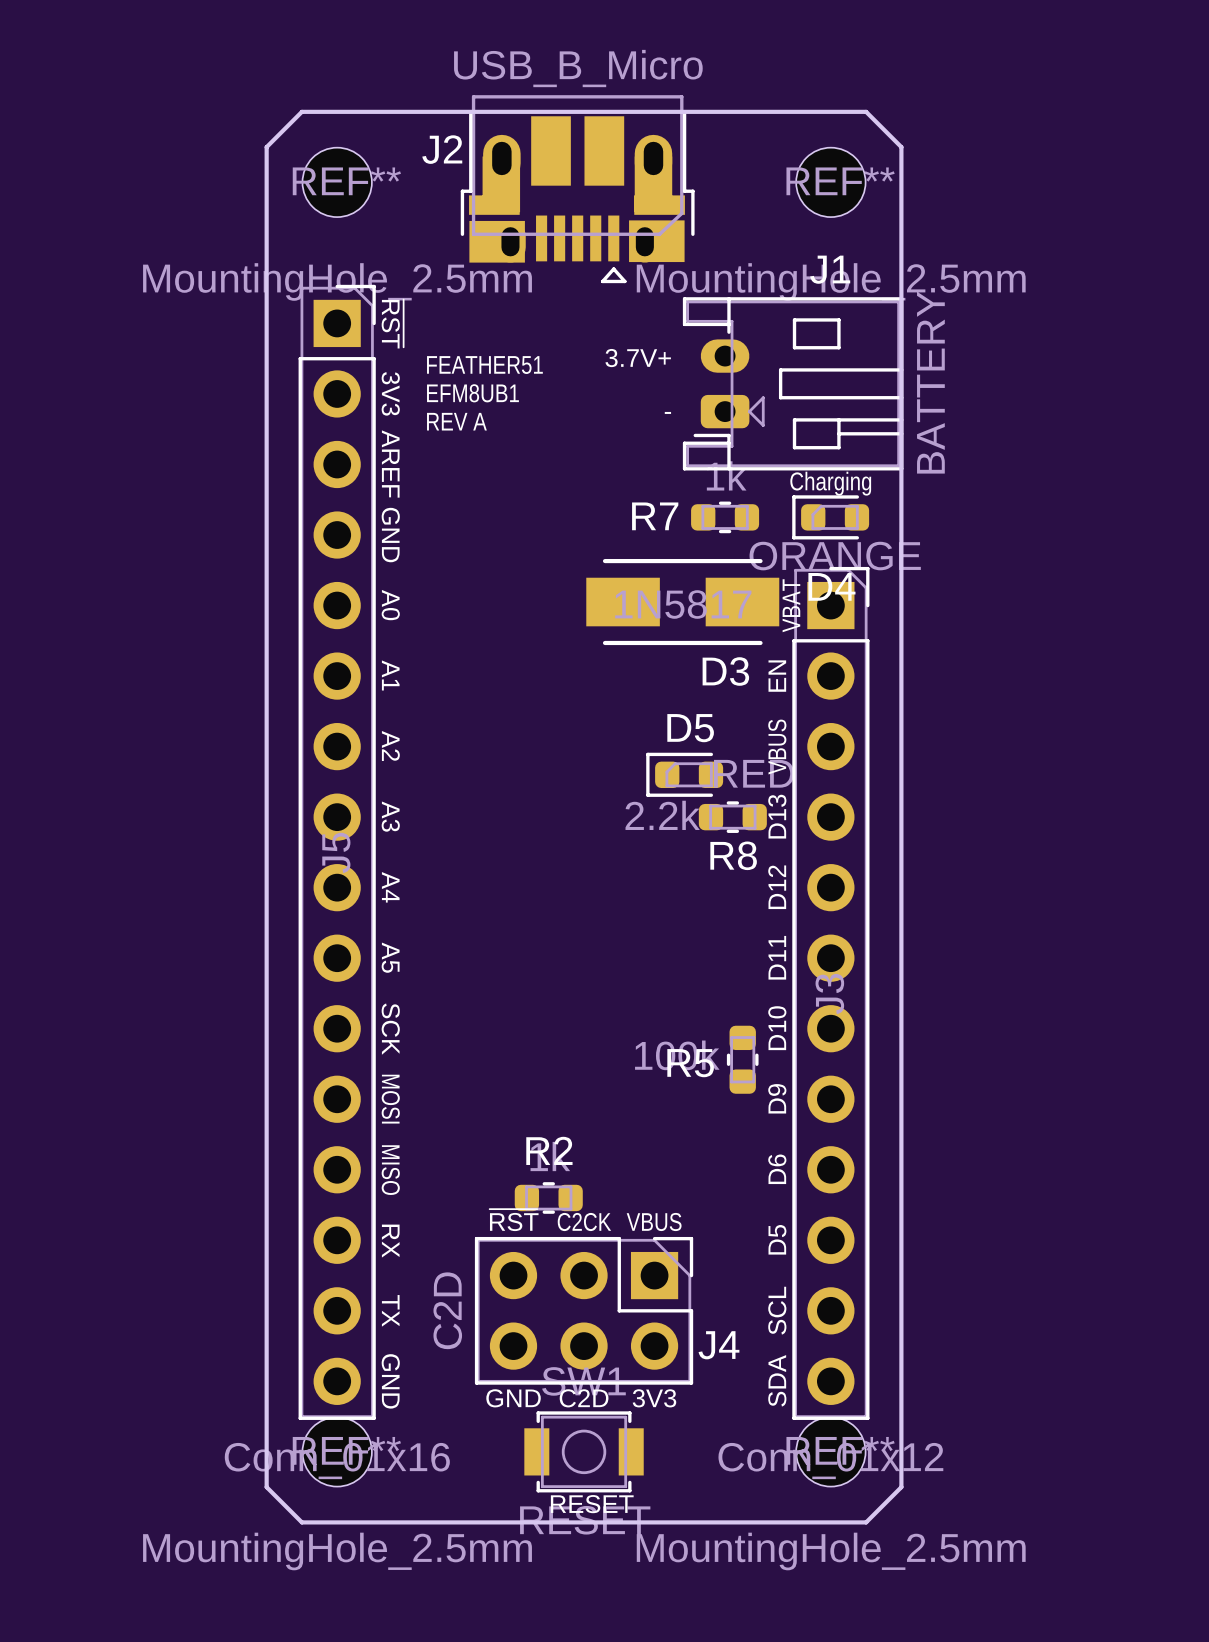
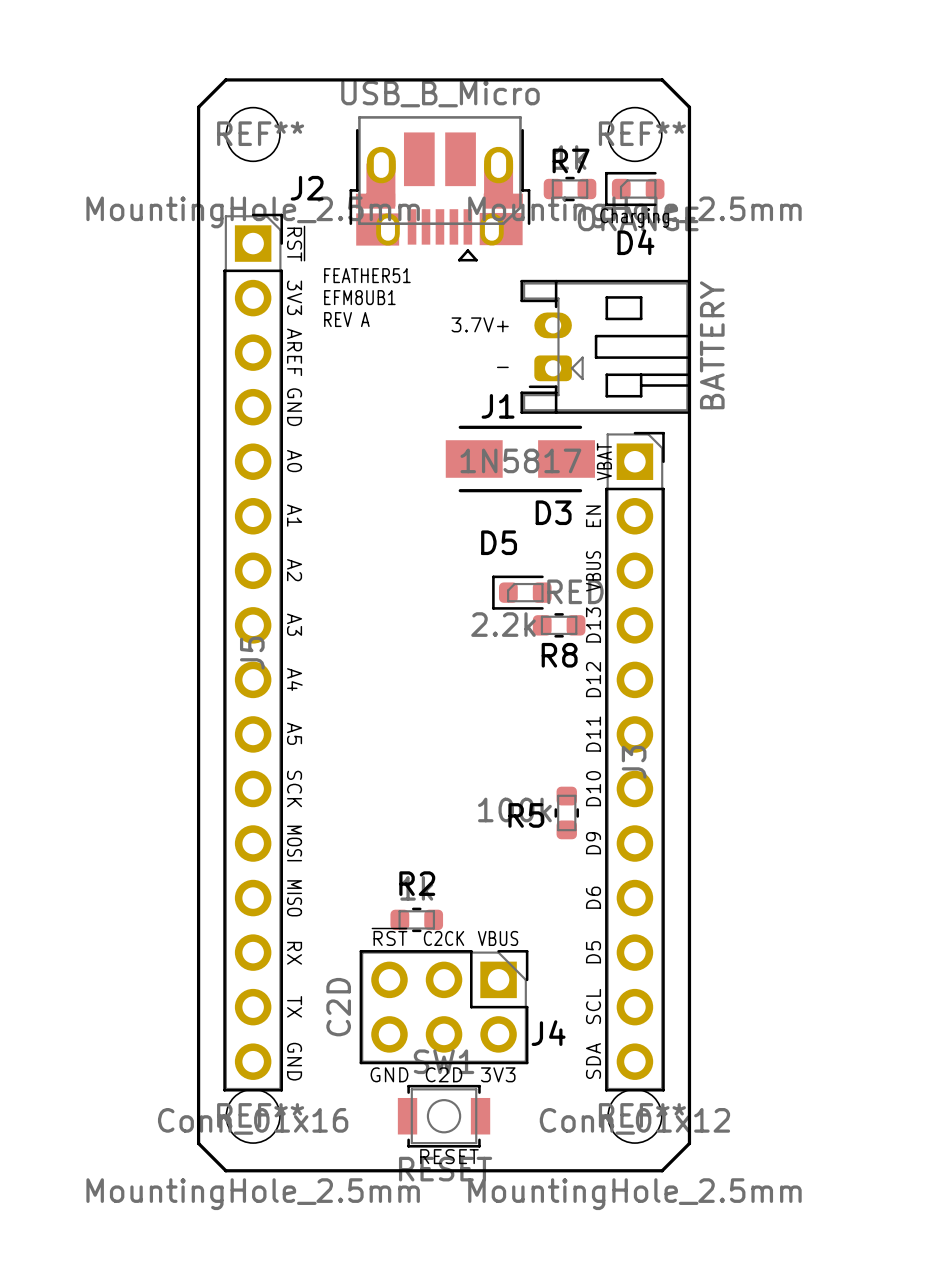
J2 name position: J2 (442, 149) -> J2 (307, 188)
J2 position: (577, 189) -> (439, 188)
J1 name position: J1 (830, 269) -> J1 (498, 406)
text: 3.7V+ (638, 358) -> none
J1 position: (793, 383) -> (605, 346)
text: - (667, 412) -> 3.7V+ (480, 324)
text: none -> - (502, 367)
text position: Charging (830, 483) -> Charging (634, 218)
R7 name position: R7 (655, 516) -> R7 (571, 160)
R7 position: (725, 517) -> (570, 189)
D4 position: (830, 517) -> (634, 189)
D5 name position: D5 (690, 728) -> D5 (499, 542)

